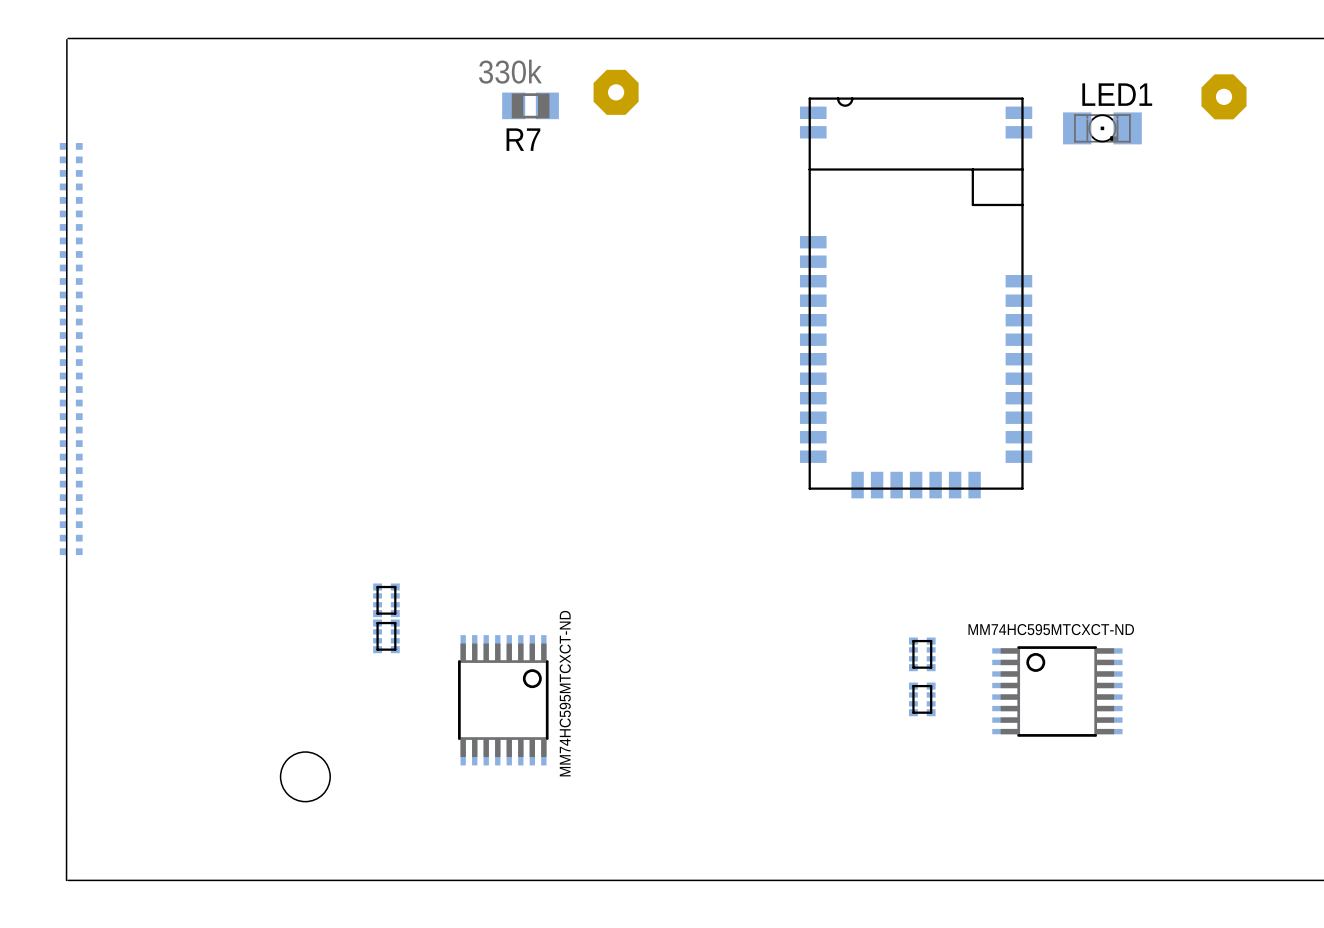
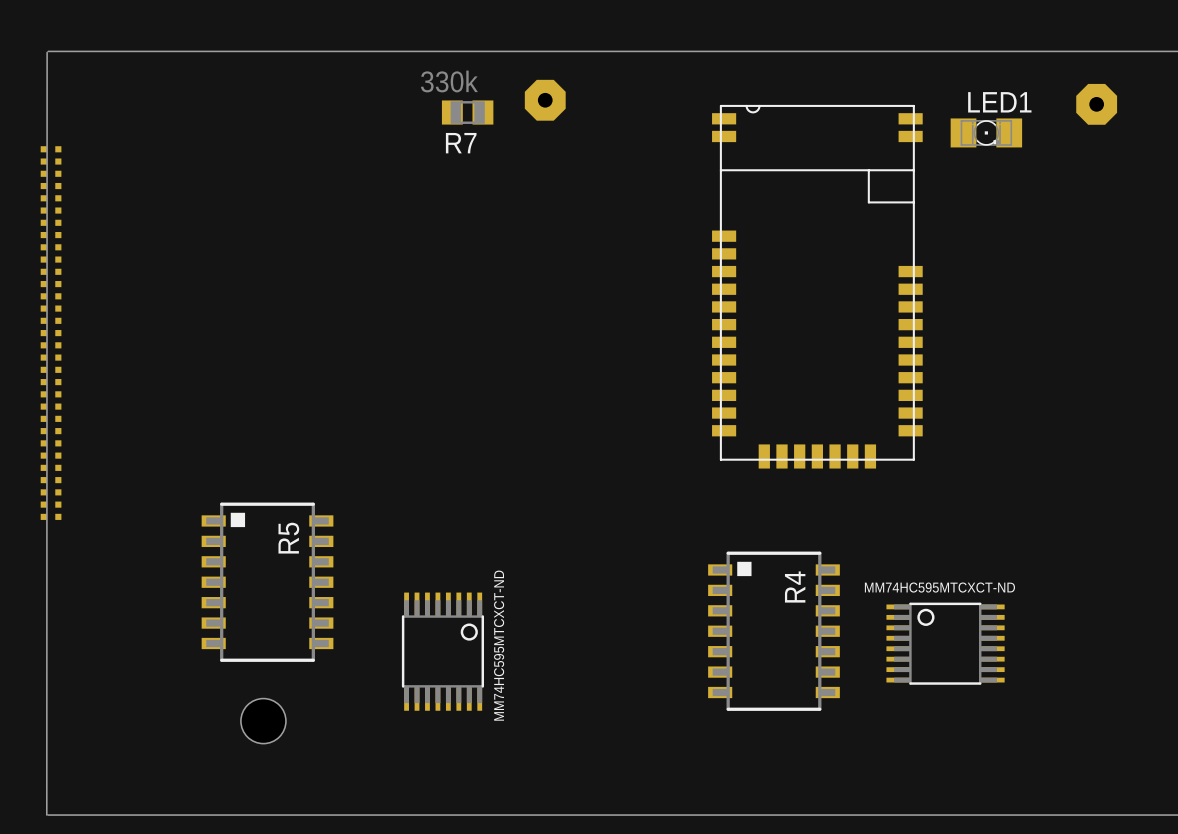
part: (386, 600) -> none
R5: none -> (267, 582)
part: (386, 636) -> none
part: (922, 654) -> none
R4: none -> (773, 631)
part: (922, 699) -> none

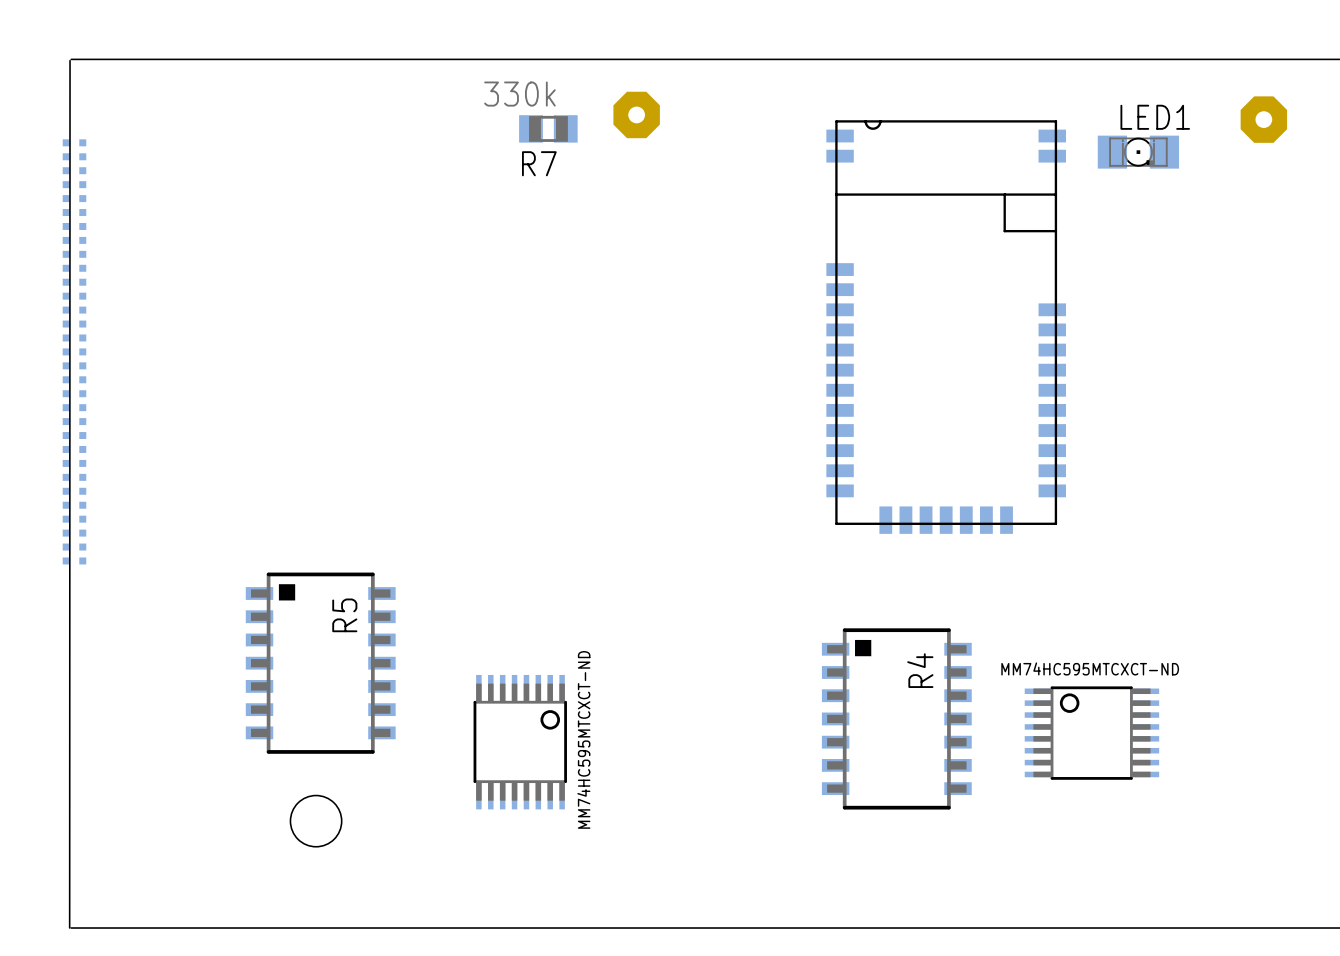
part: none -> (74, 142)
part: none -> (74, 156)
part: (51, 504) -> none
part: (51, 516) -> none

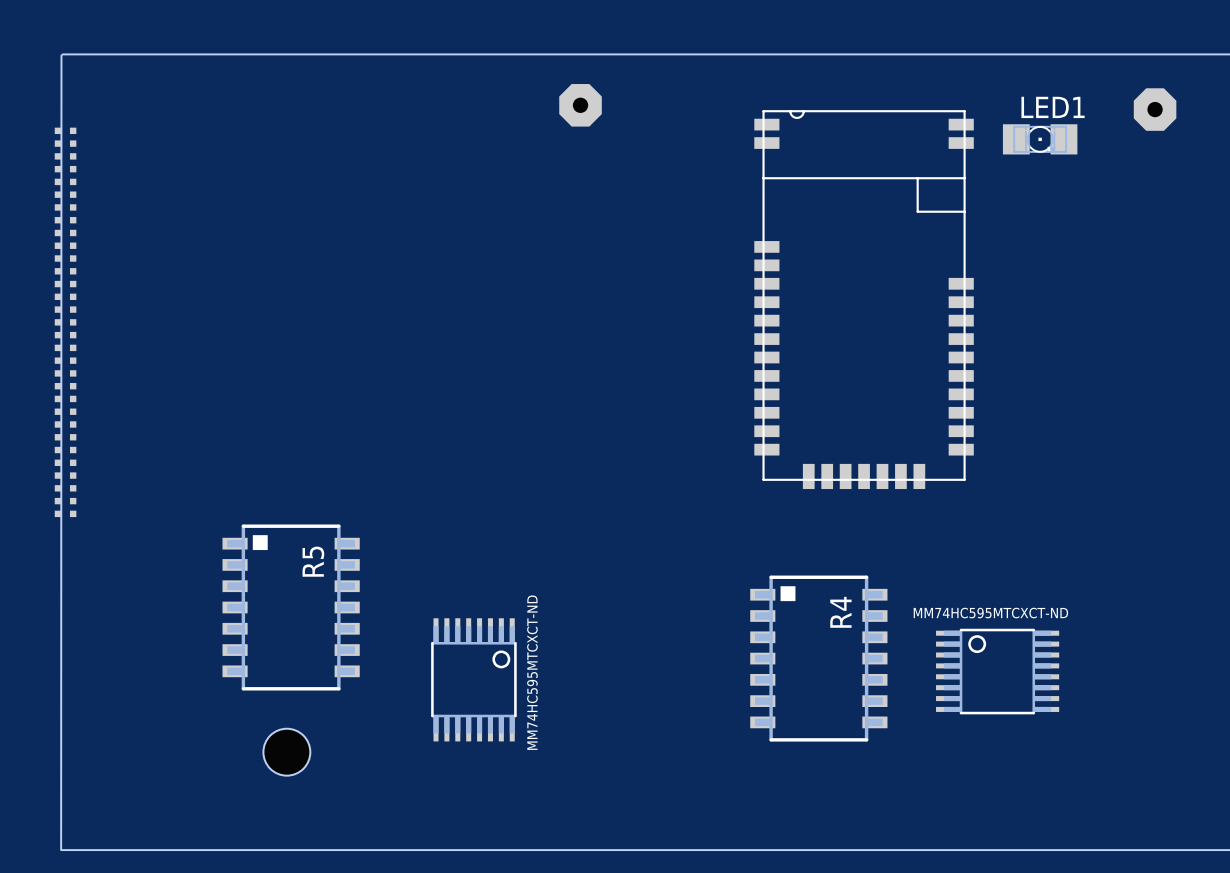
R7: 330k (548, 128) -> none

